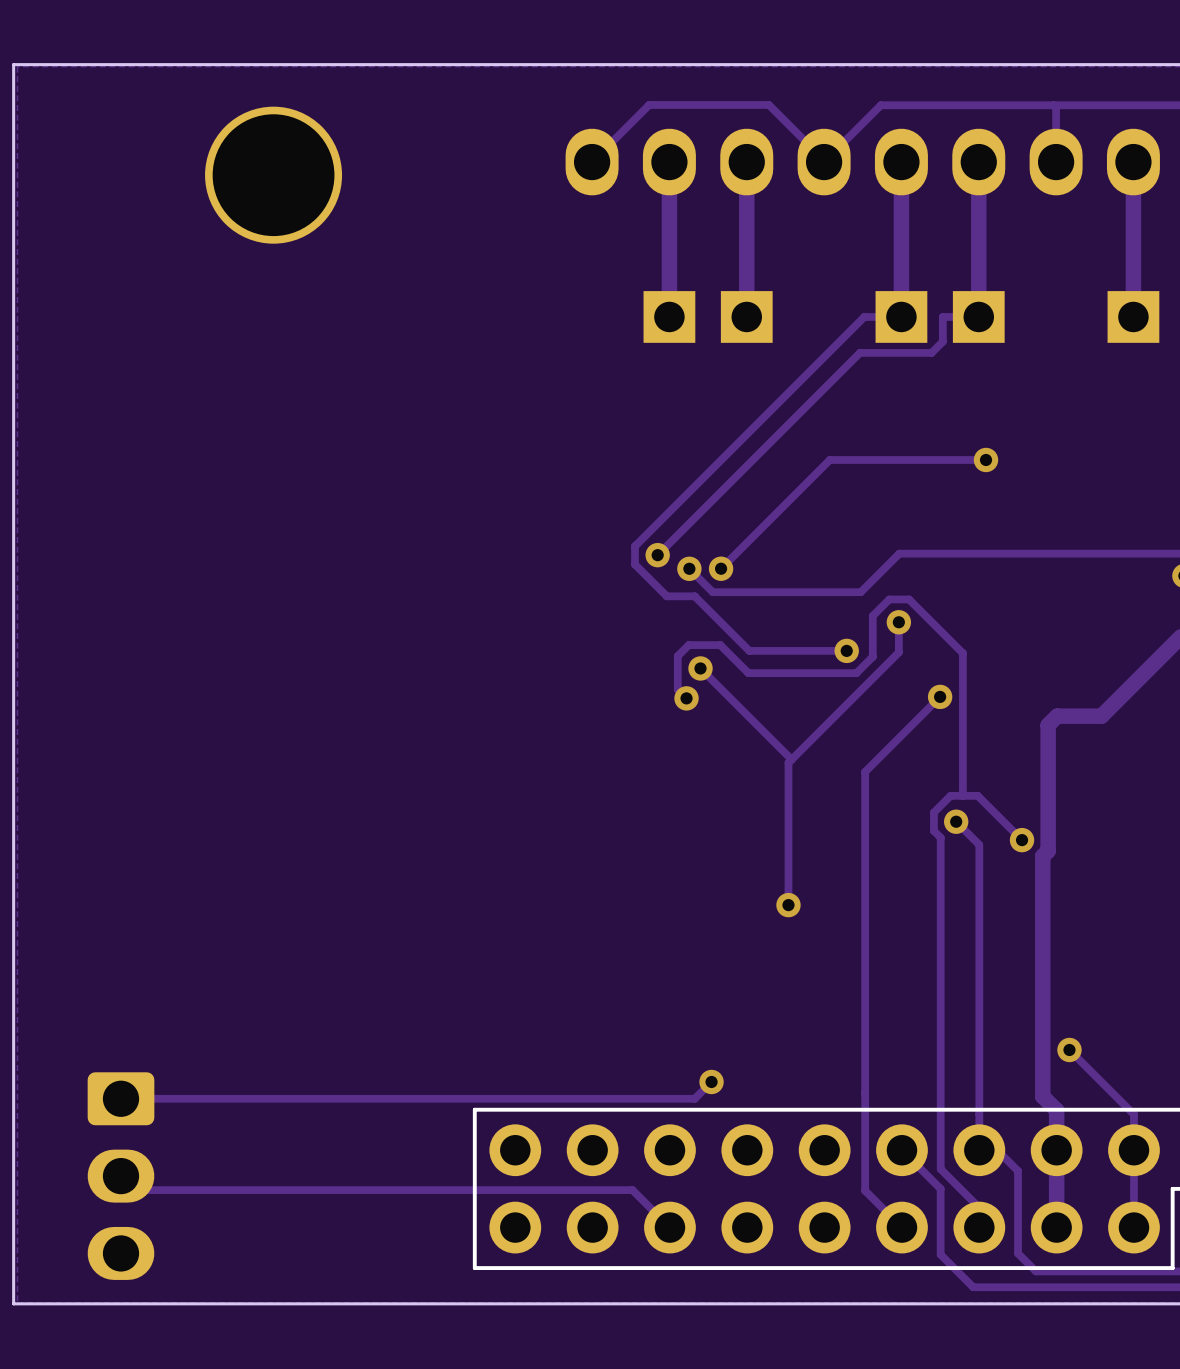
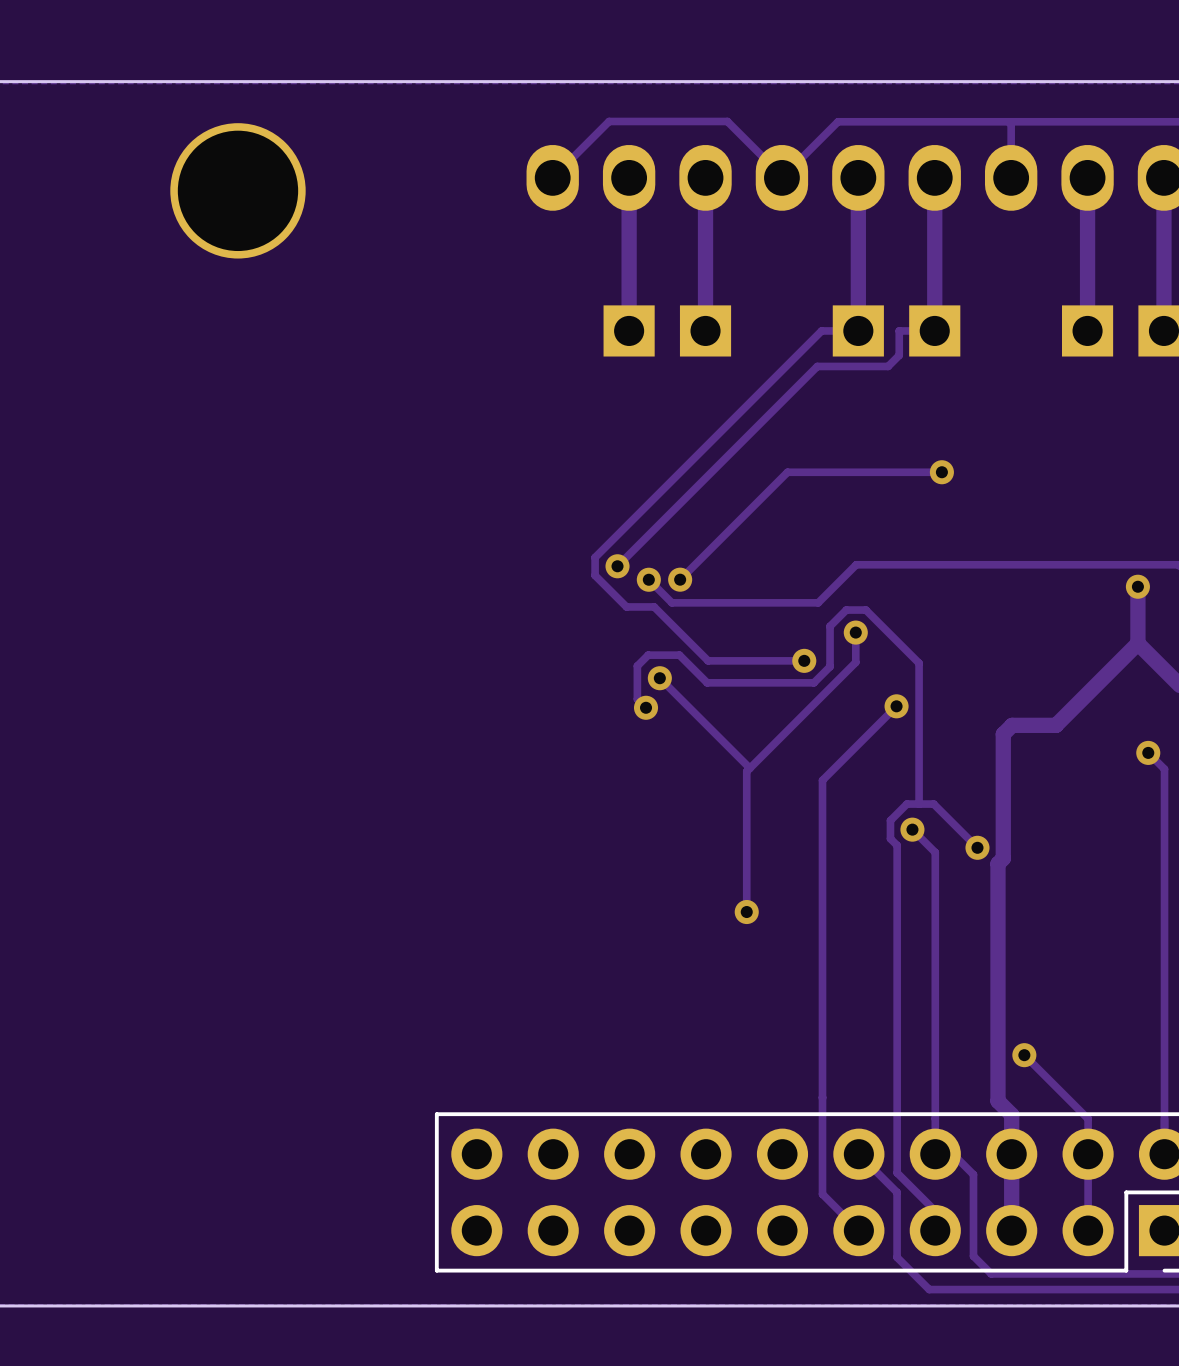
track: (711, 1081) (694, 1098) (121, 1098) -> none
via: (711, 1081) -> none
track: (121, 1176) (135, 1190) (632, 1190) (669, 1227) -> none
part: (121, 1176) -> none

